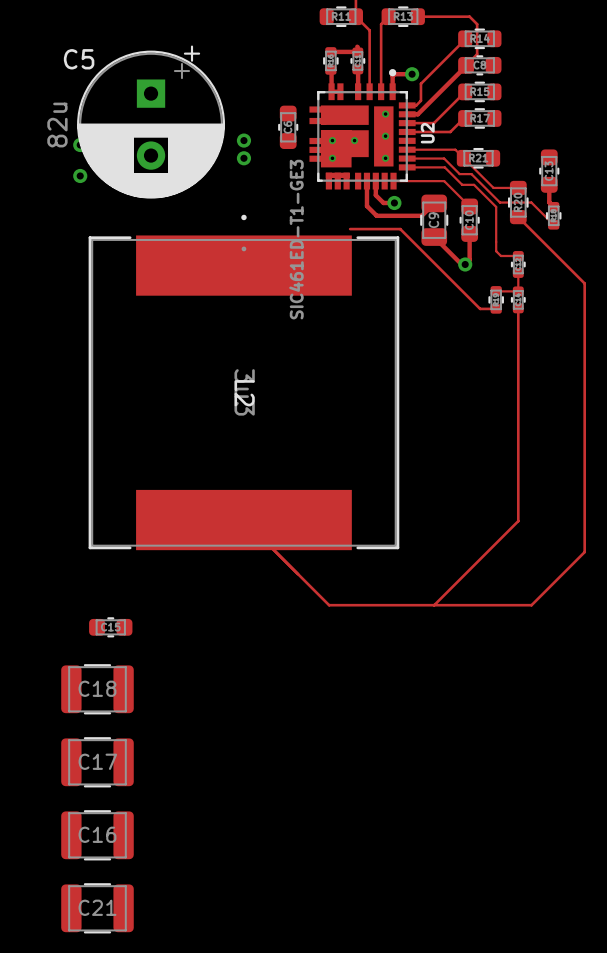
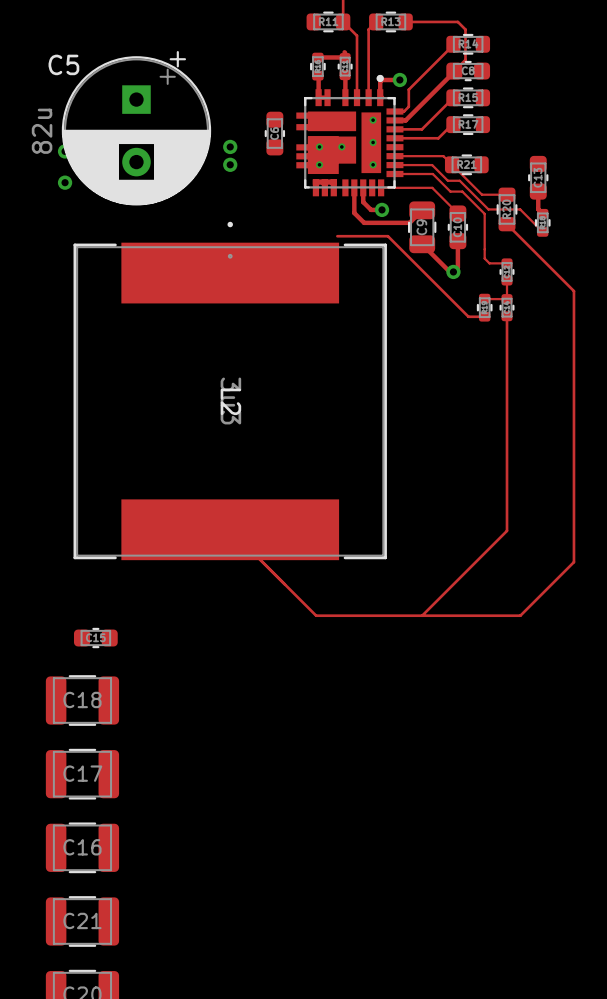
U2 name: U2 (427, 133) -> none
U2 value: SIC461ED-T1-GE3 (296, 239) -> none

